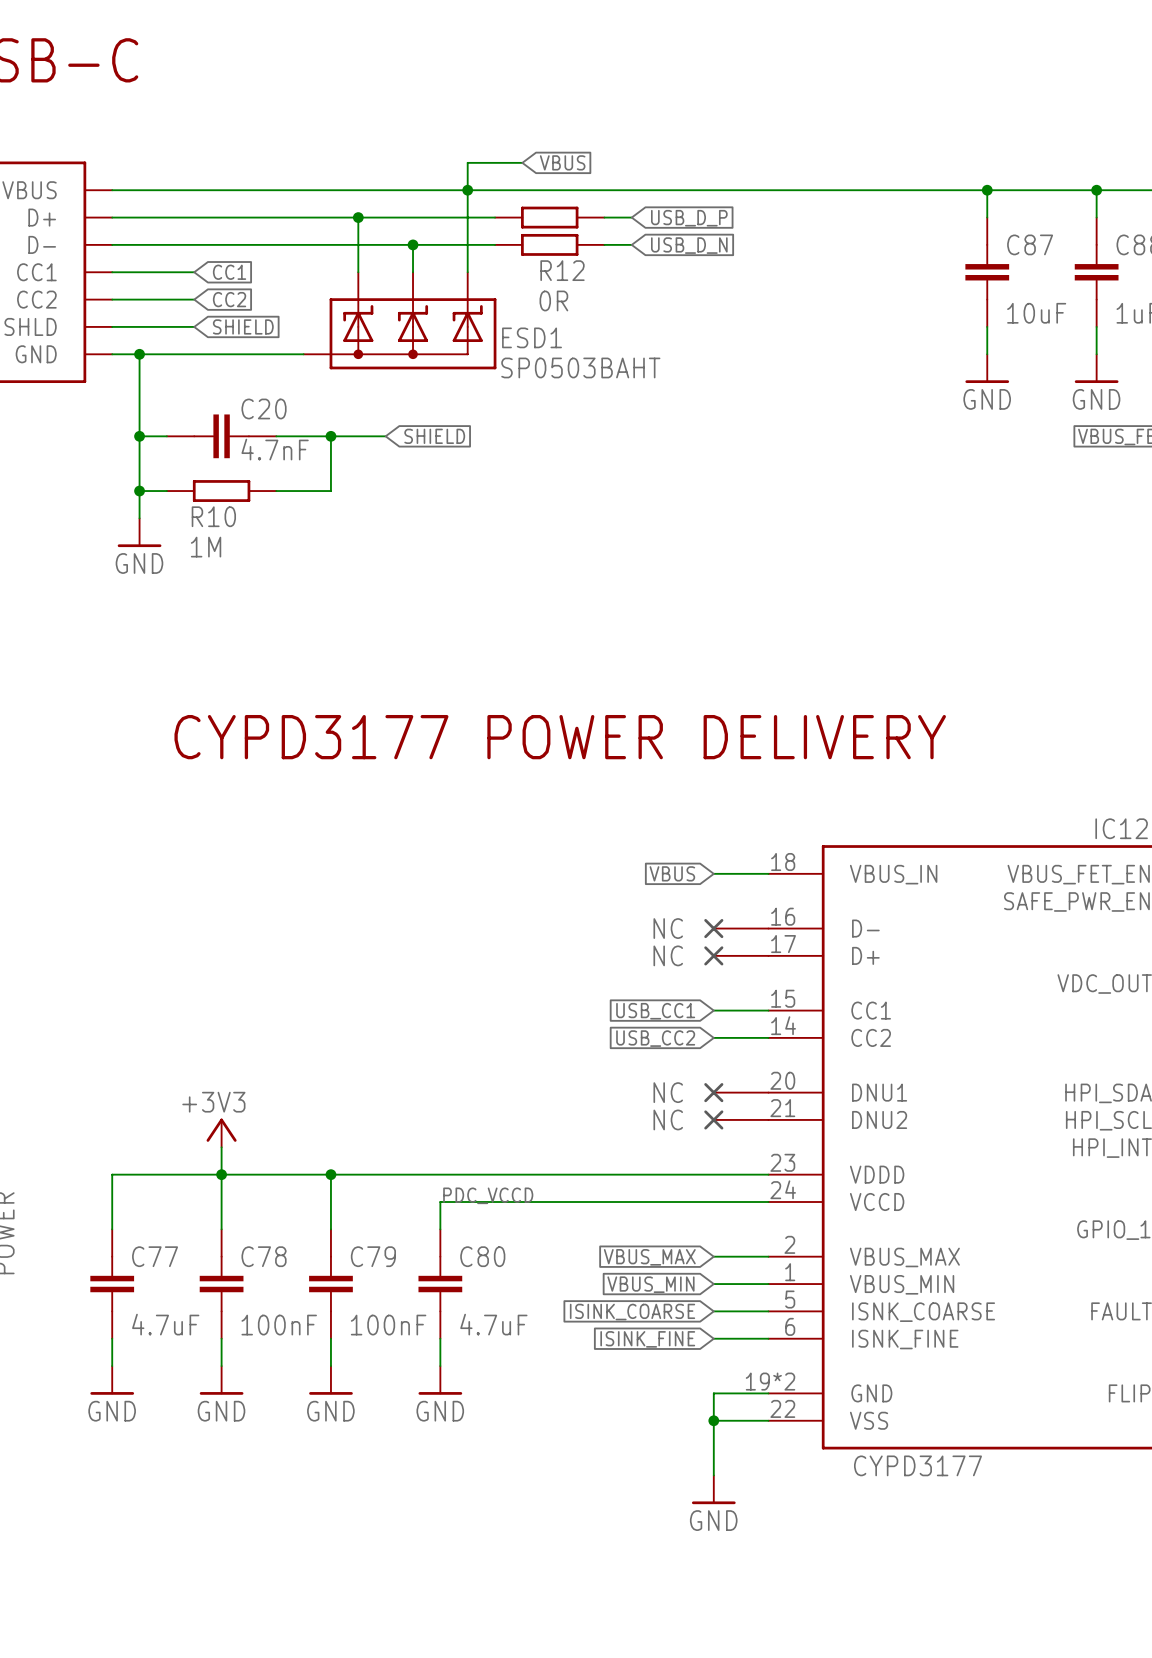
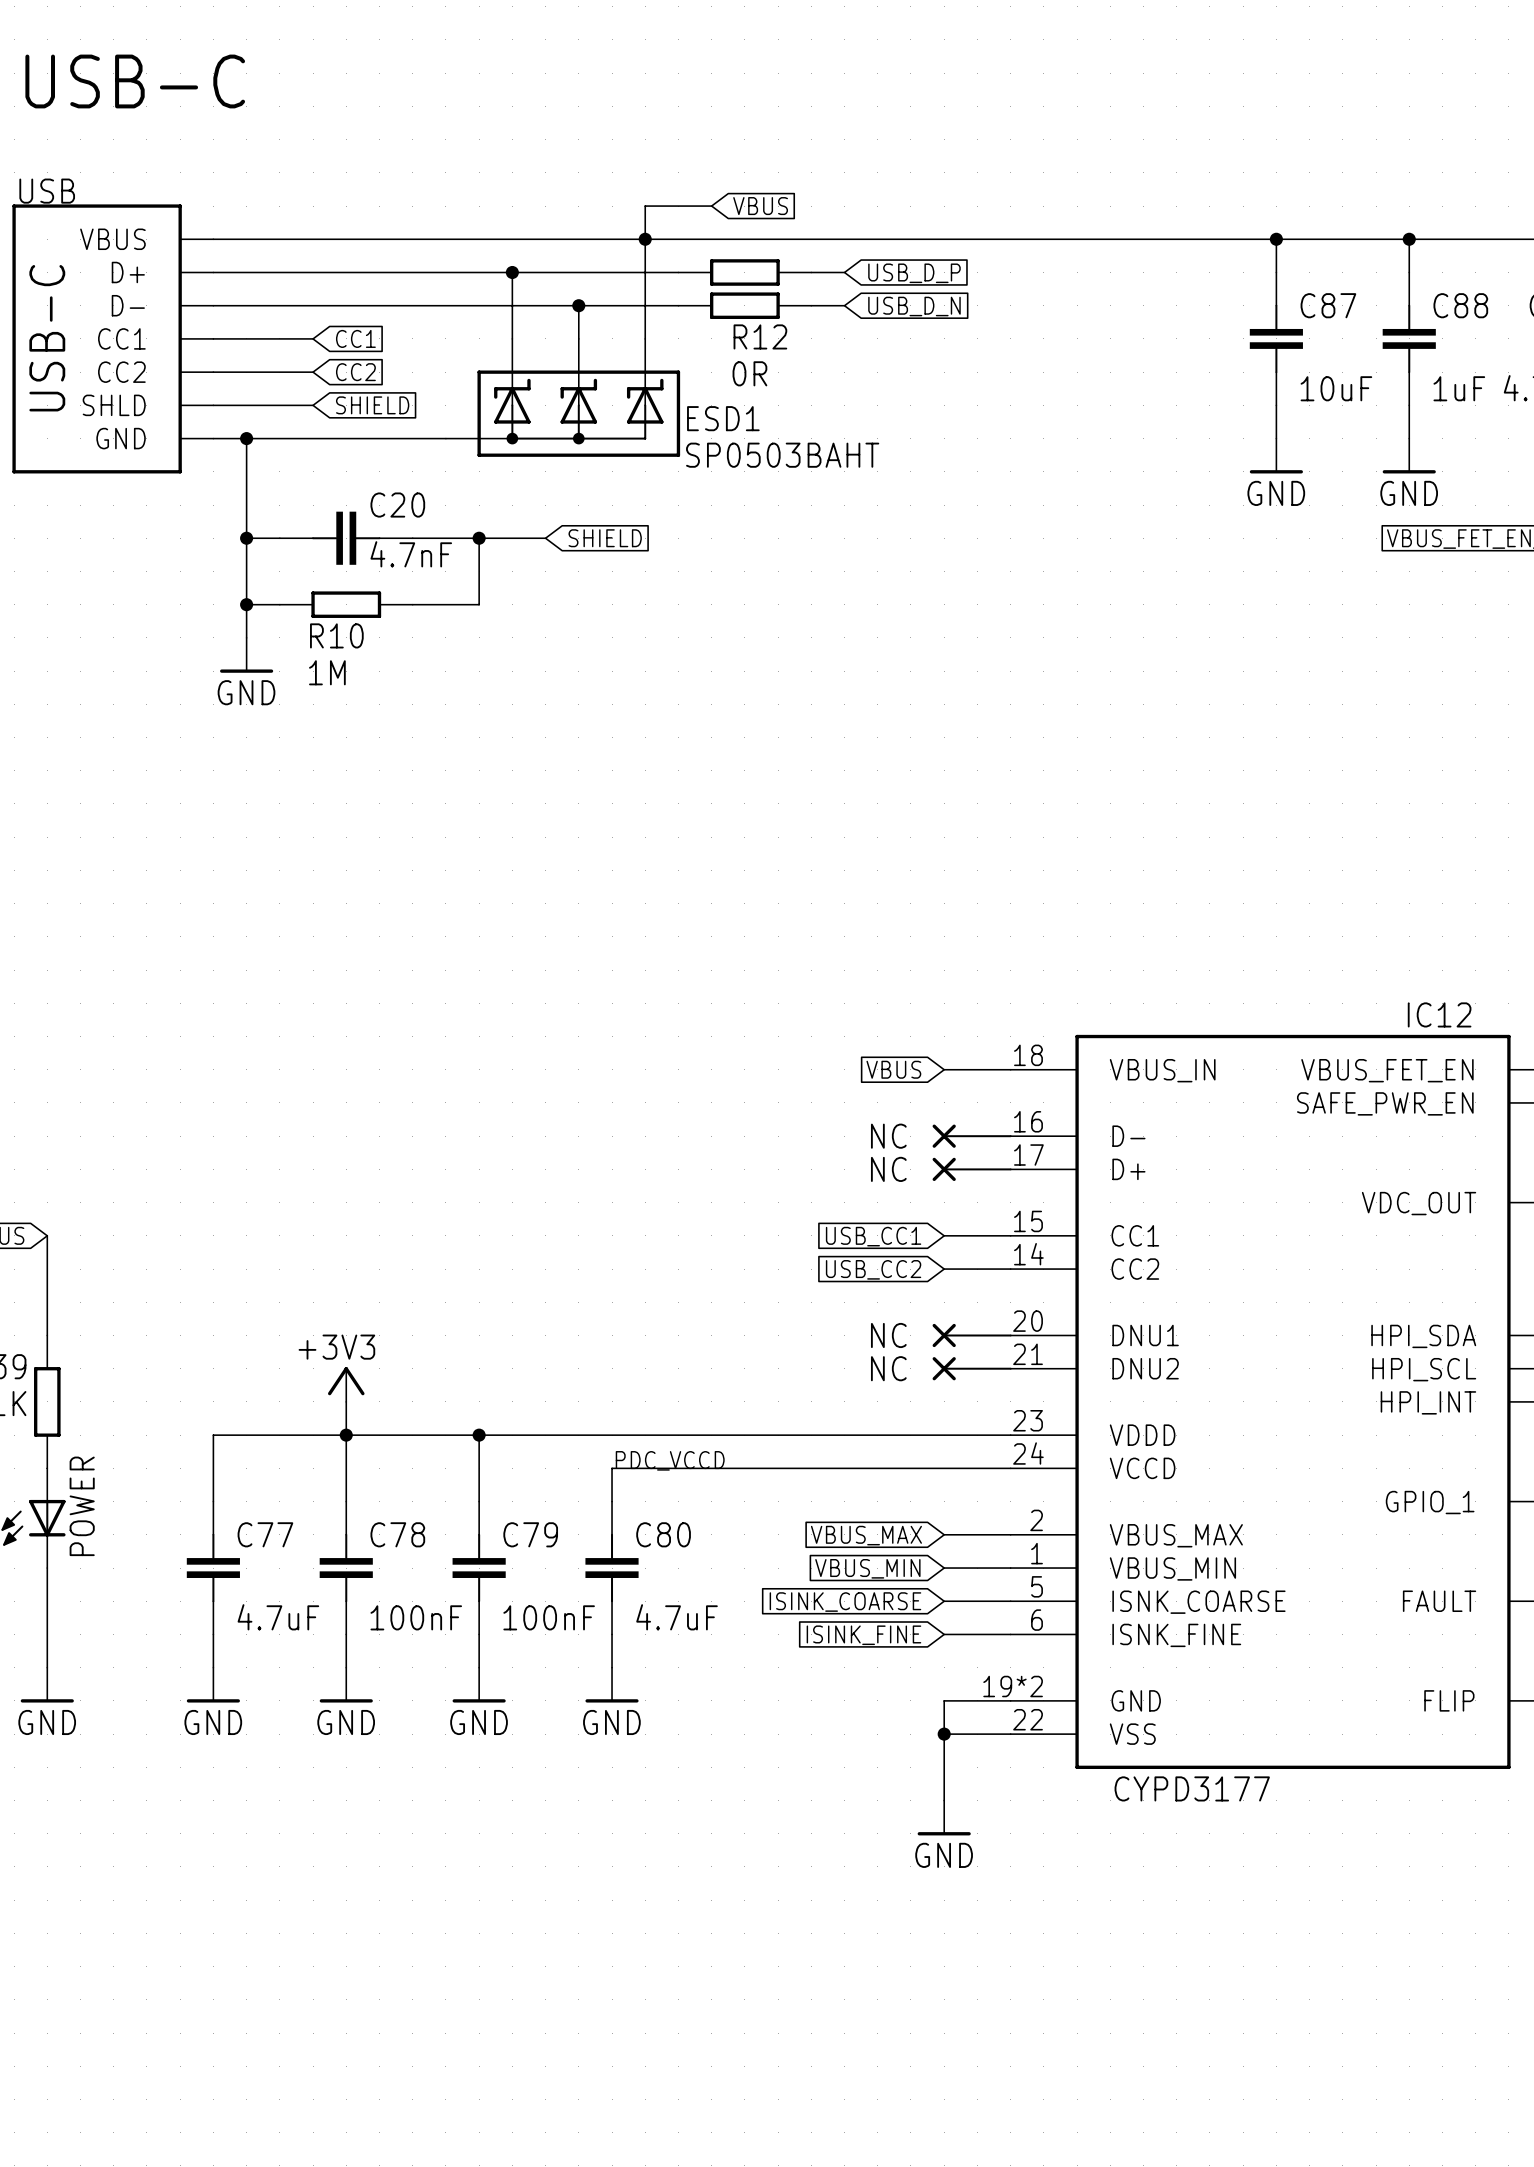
text: CYPD3177 POWER DELIVERY (560, 737) -> none

